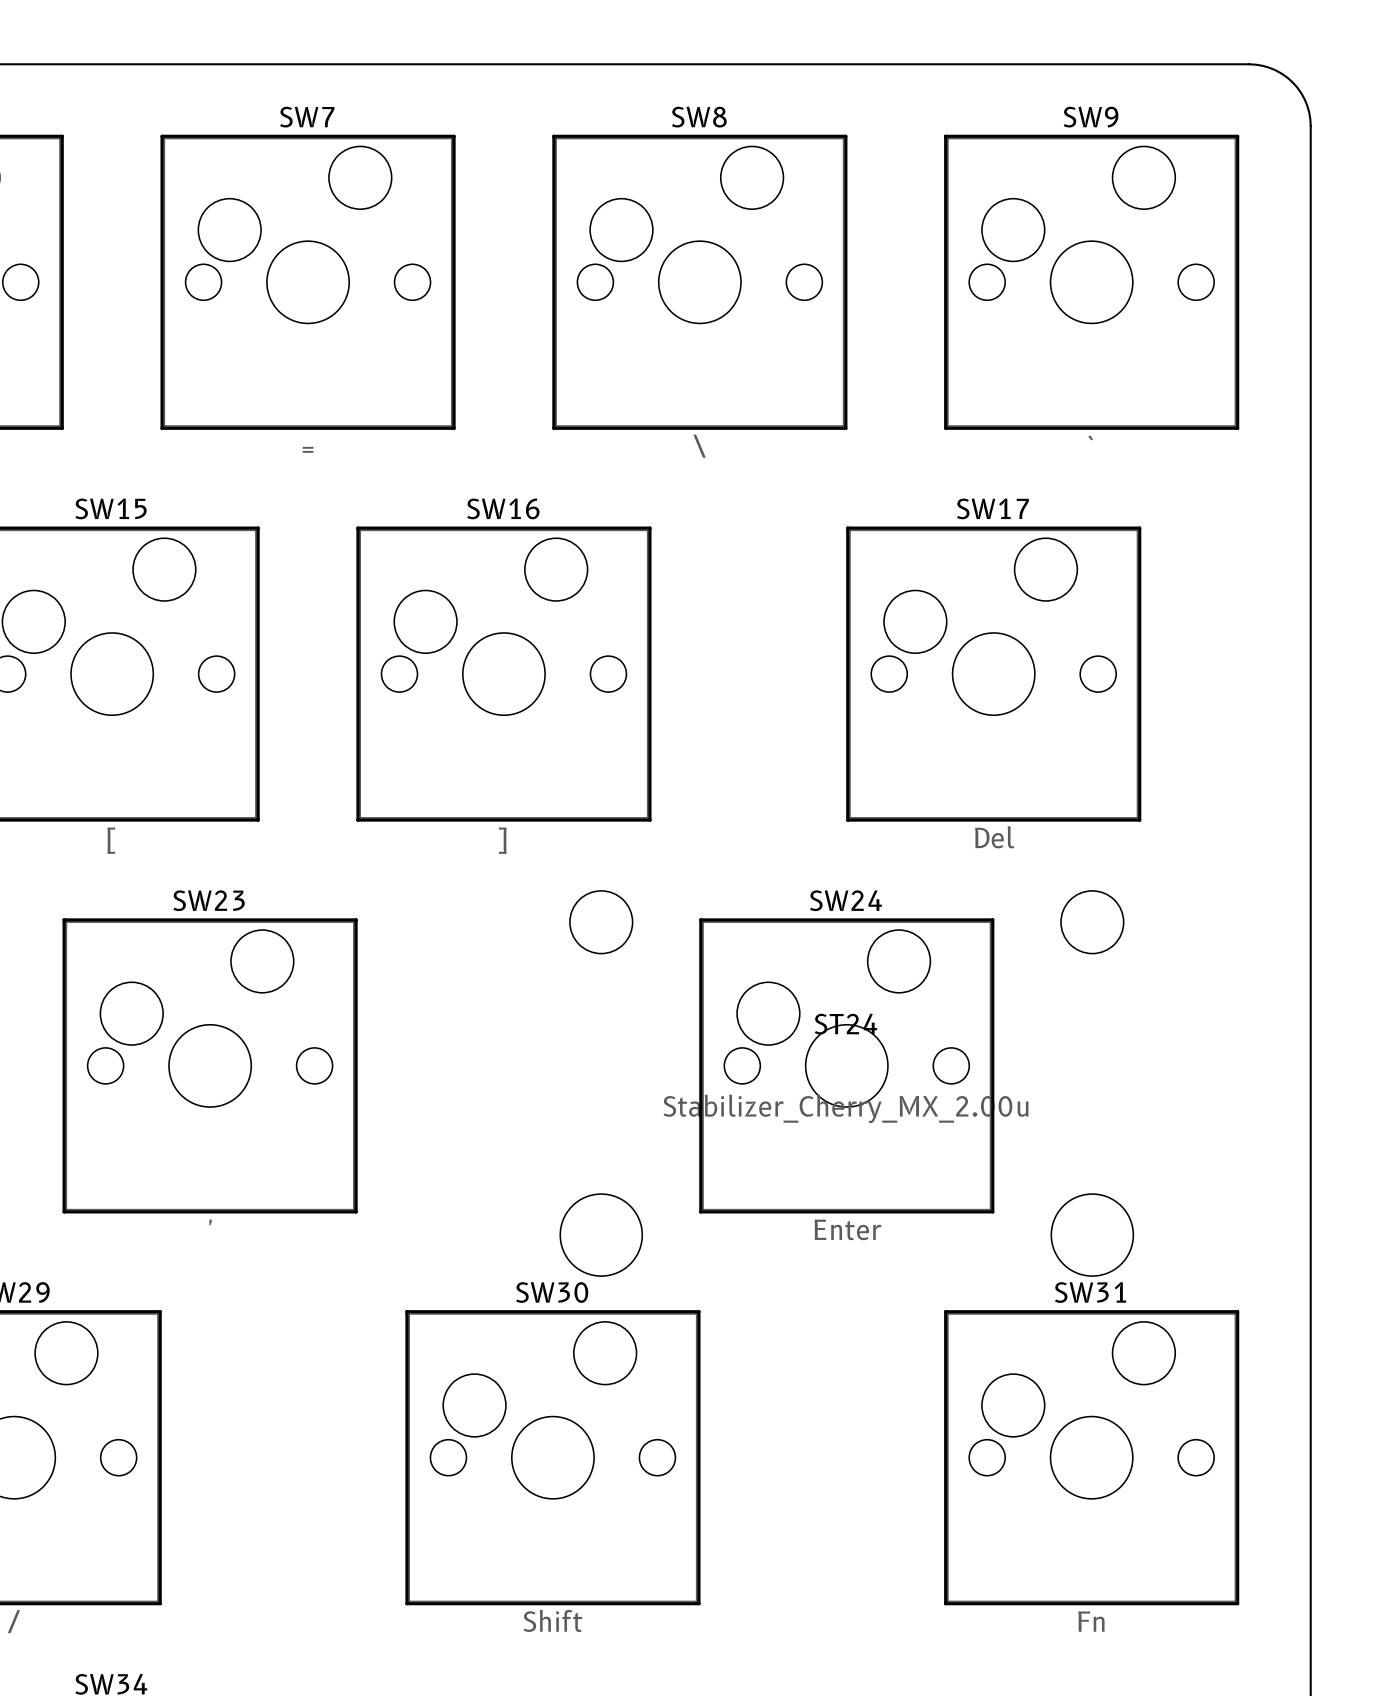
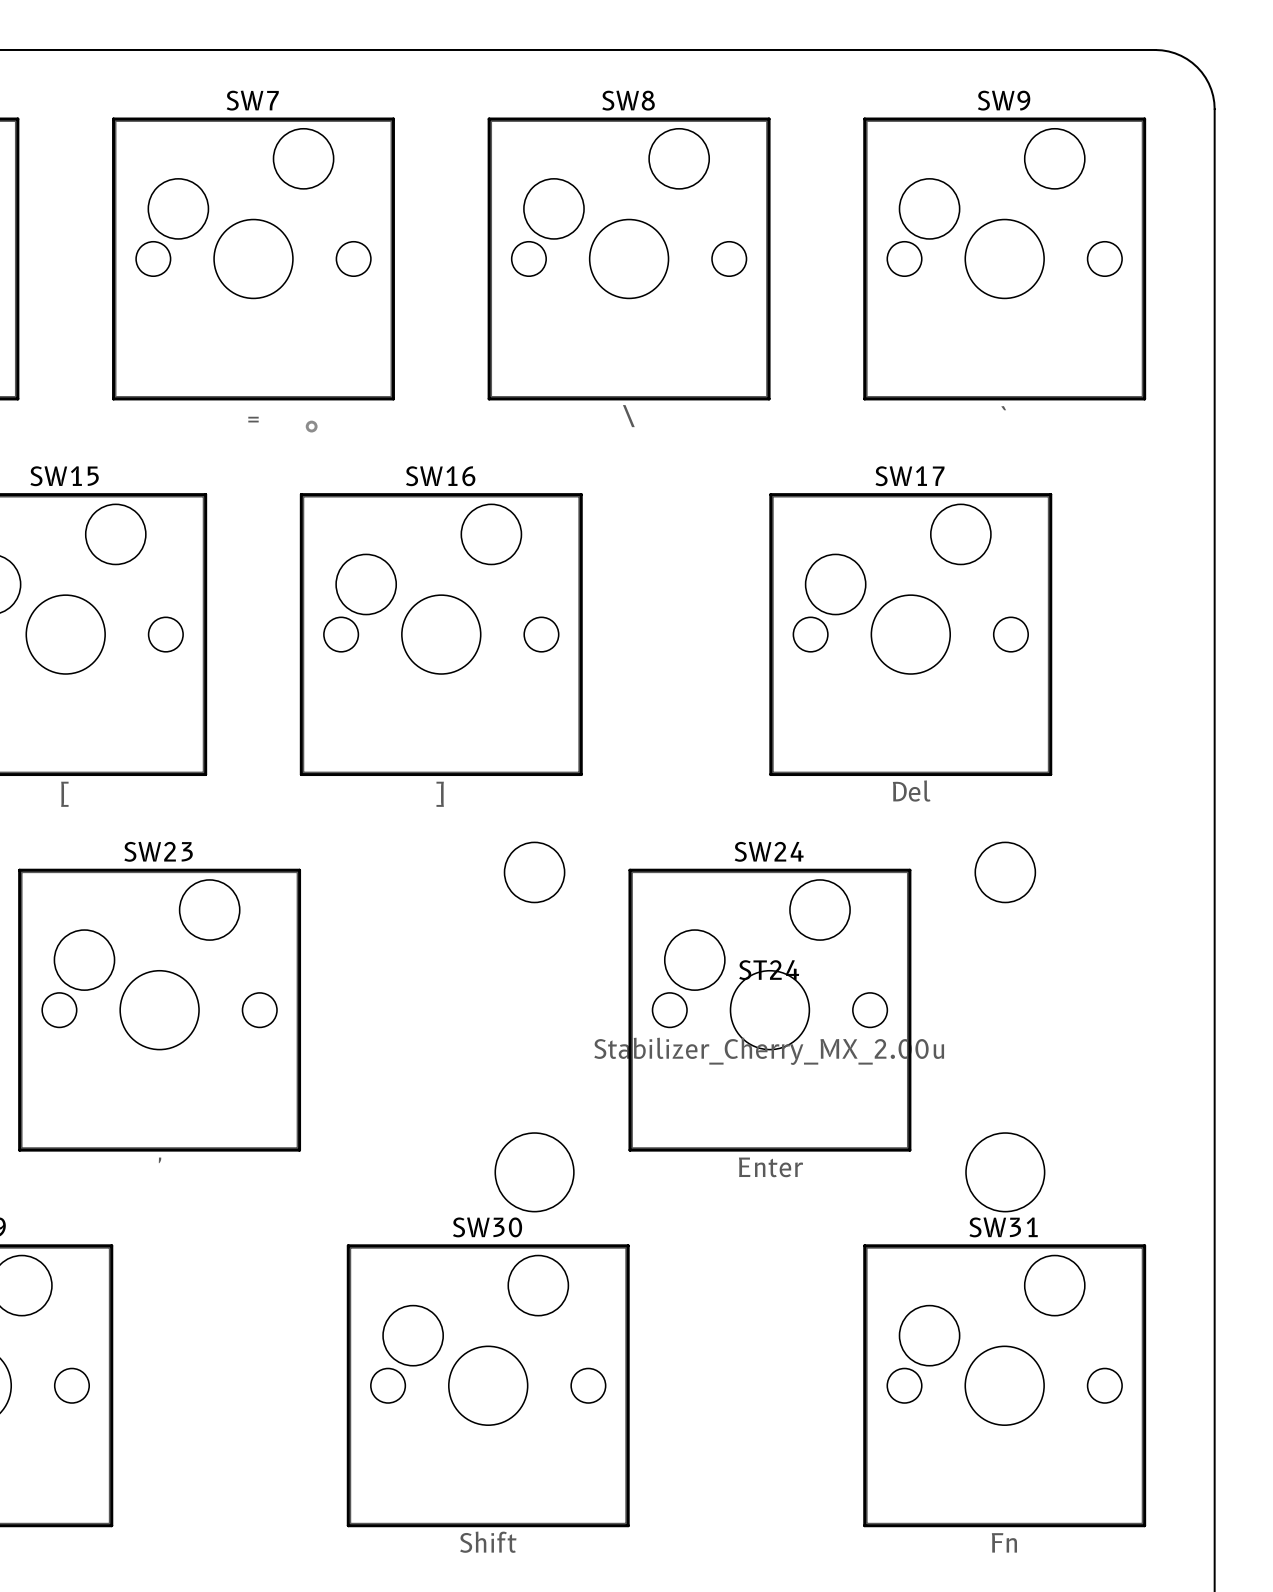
via: none -> (311, 426)

